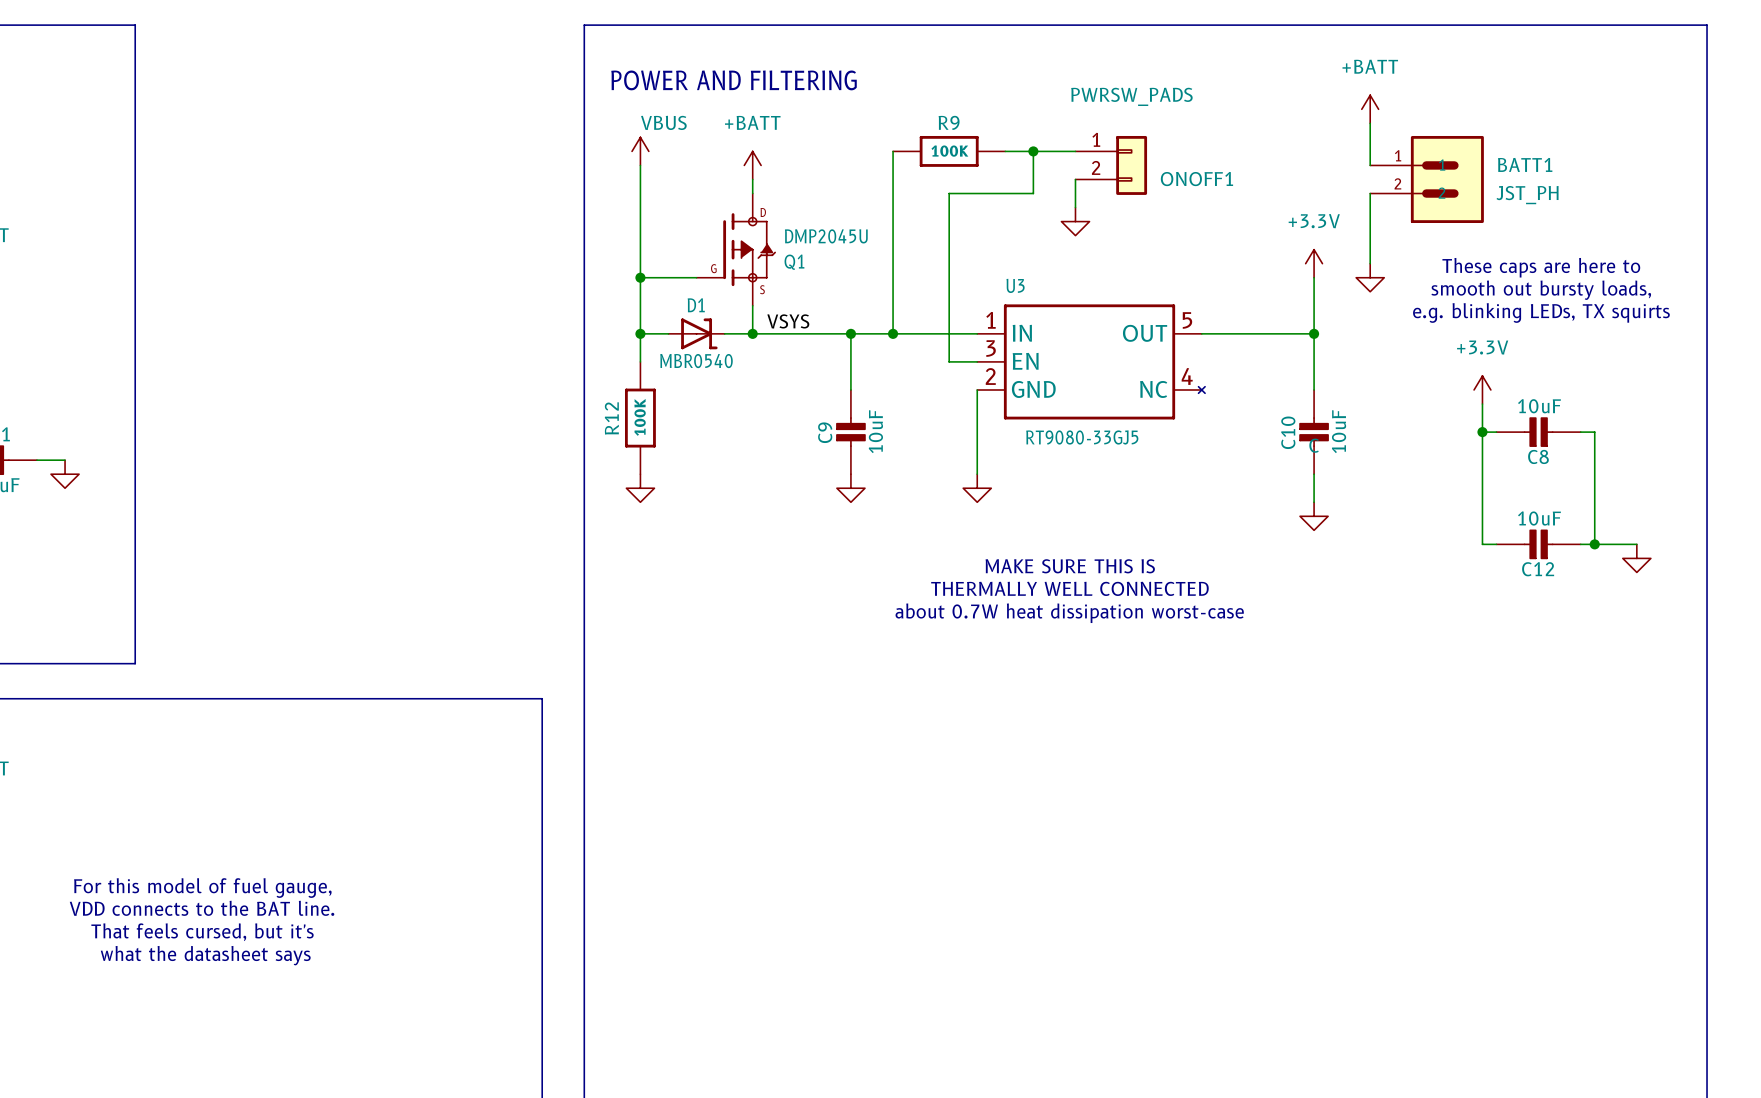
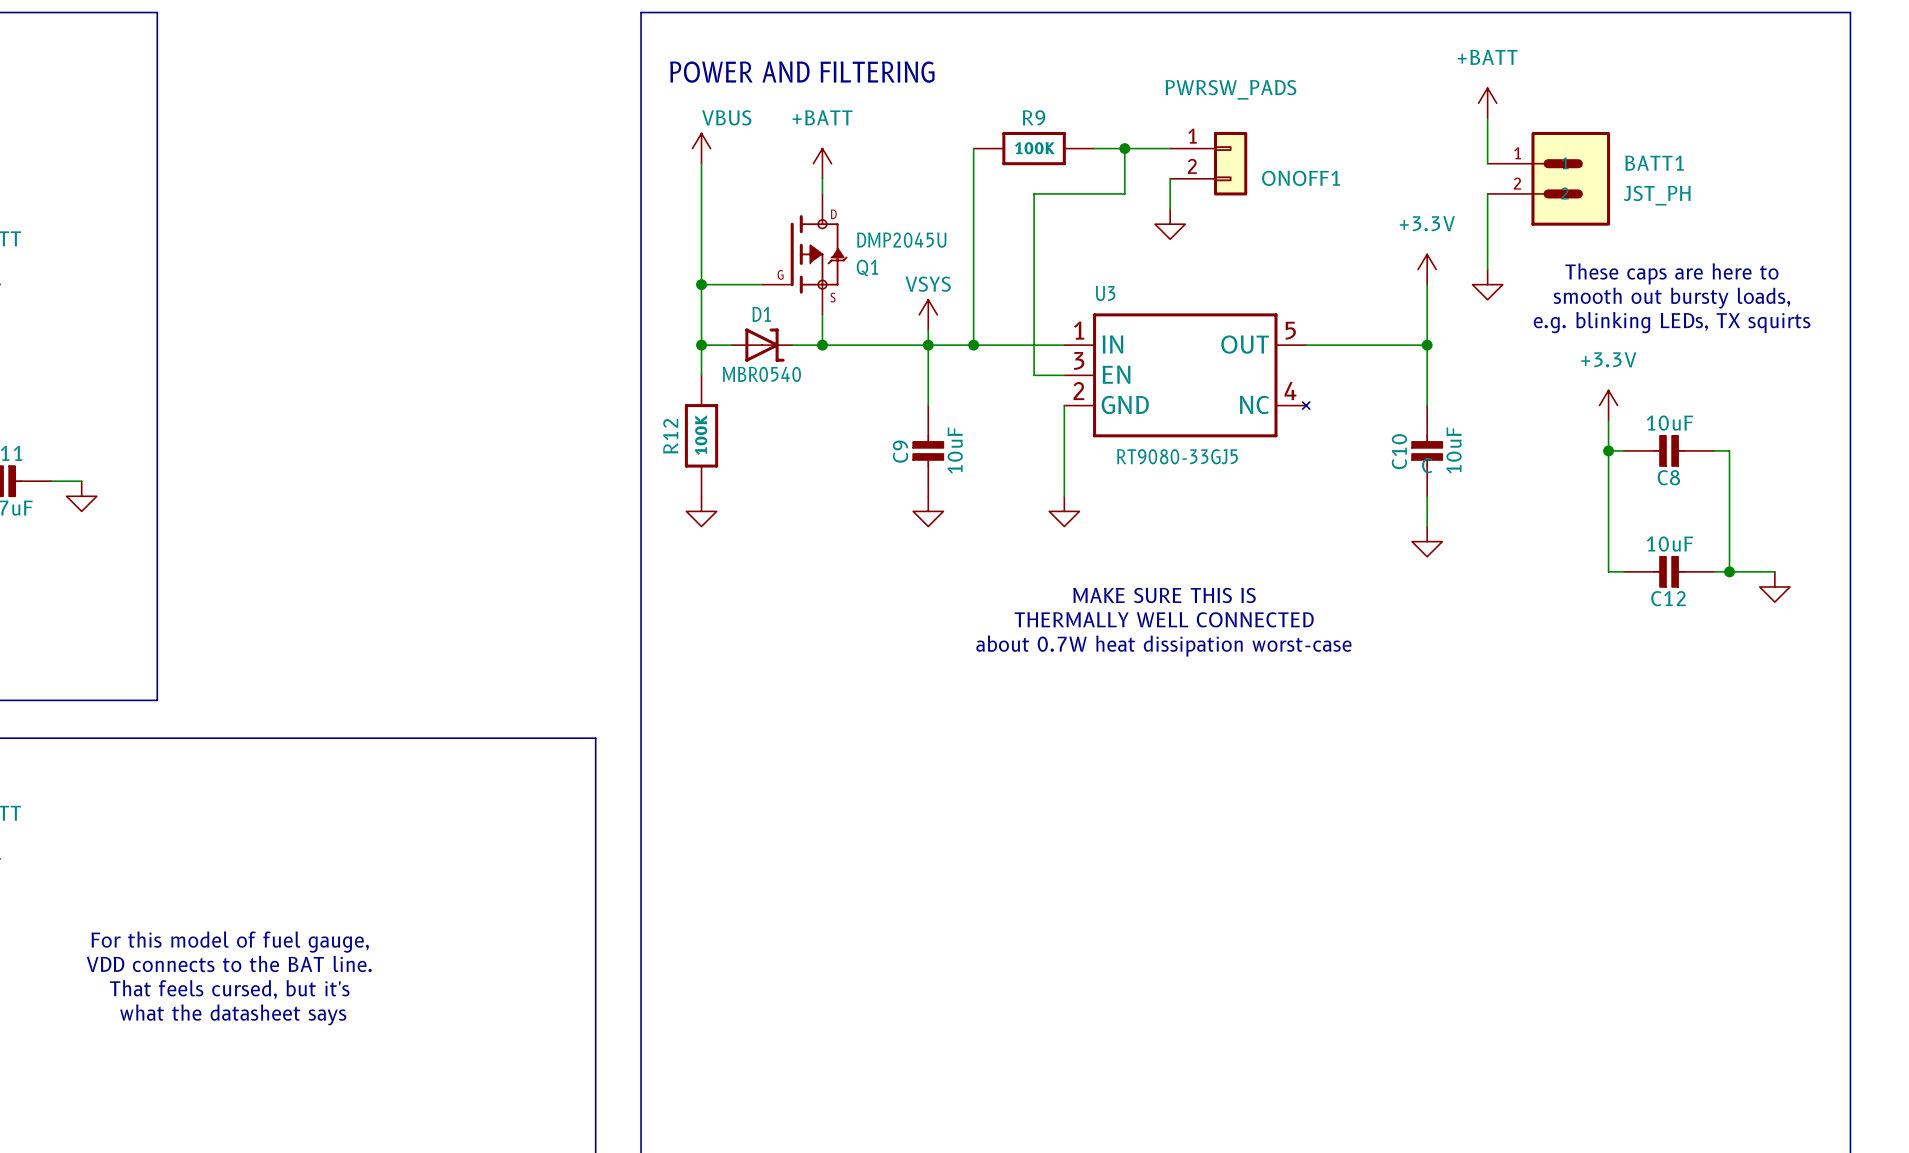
power symbol: none -> VSYS (928, 314)
wire: none -> (928, 330) (928, 345)
label: VSYS (788, 321) -> none

